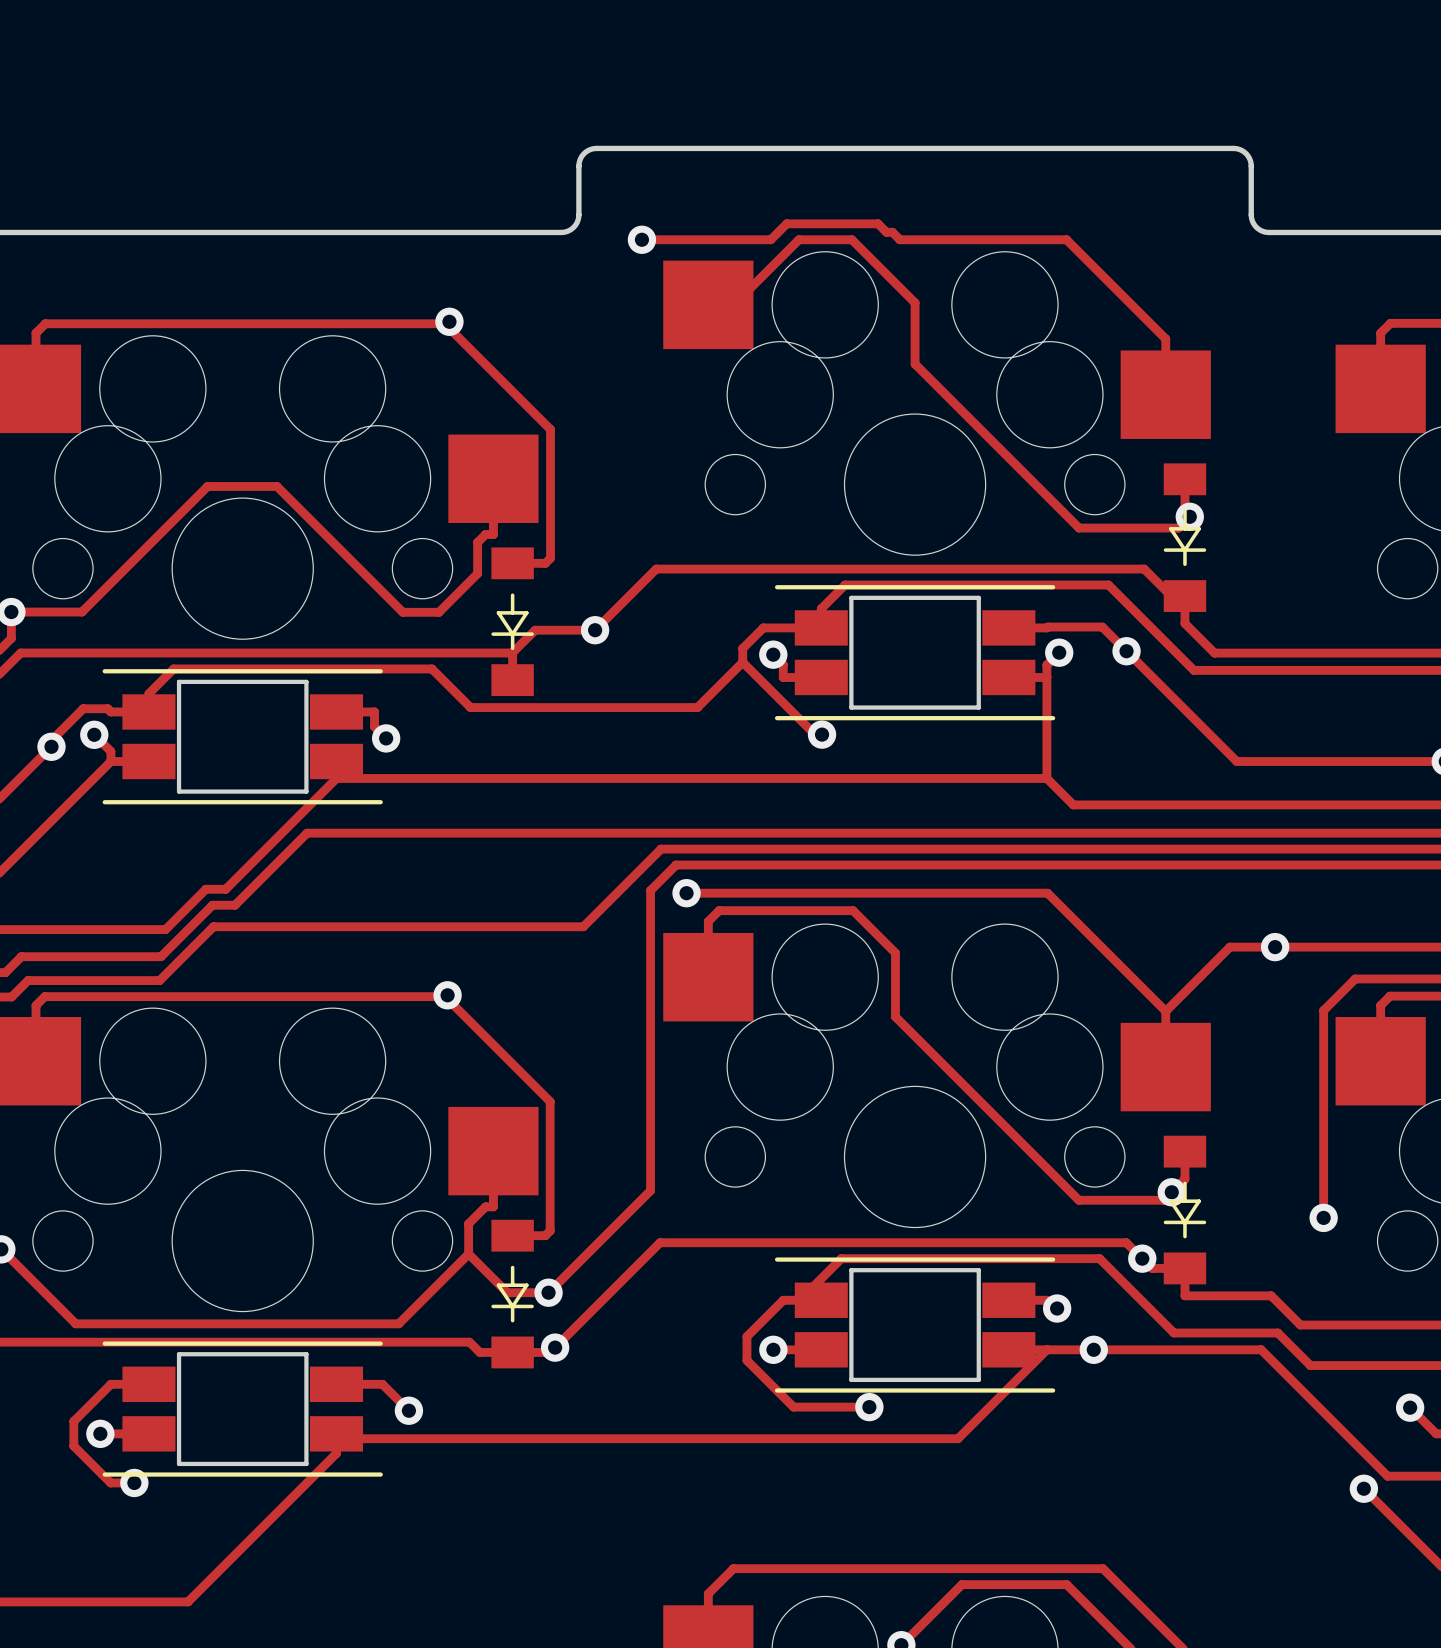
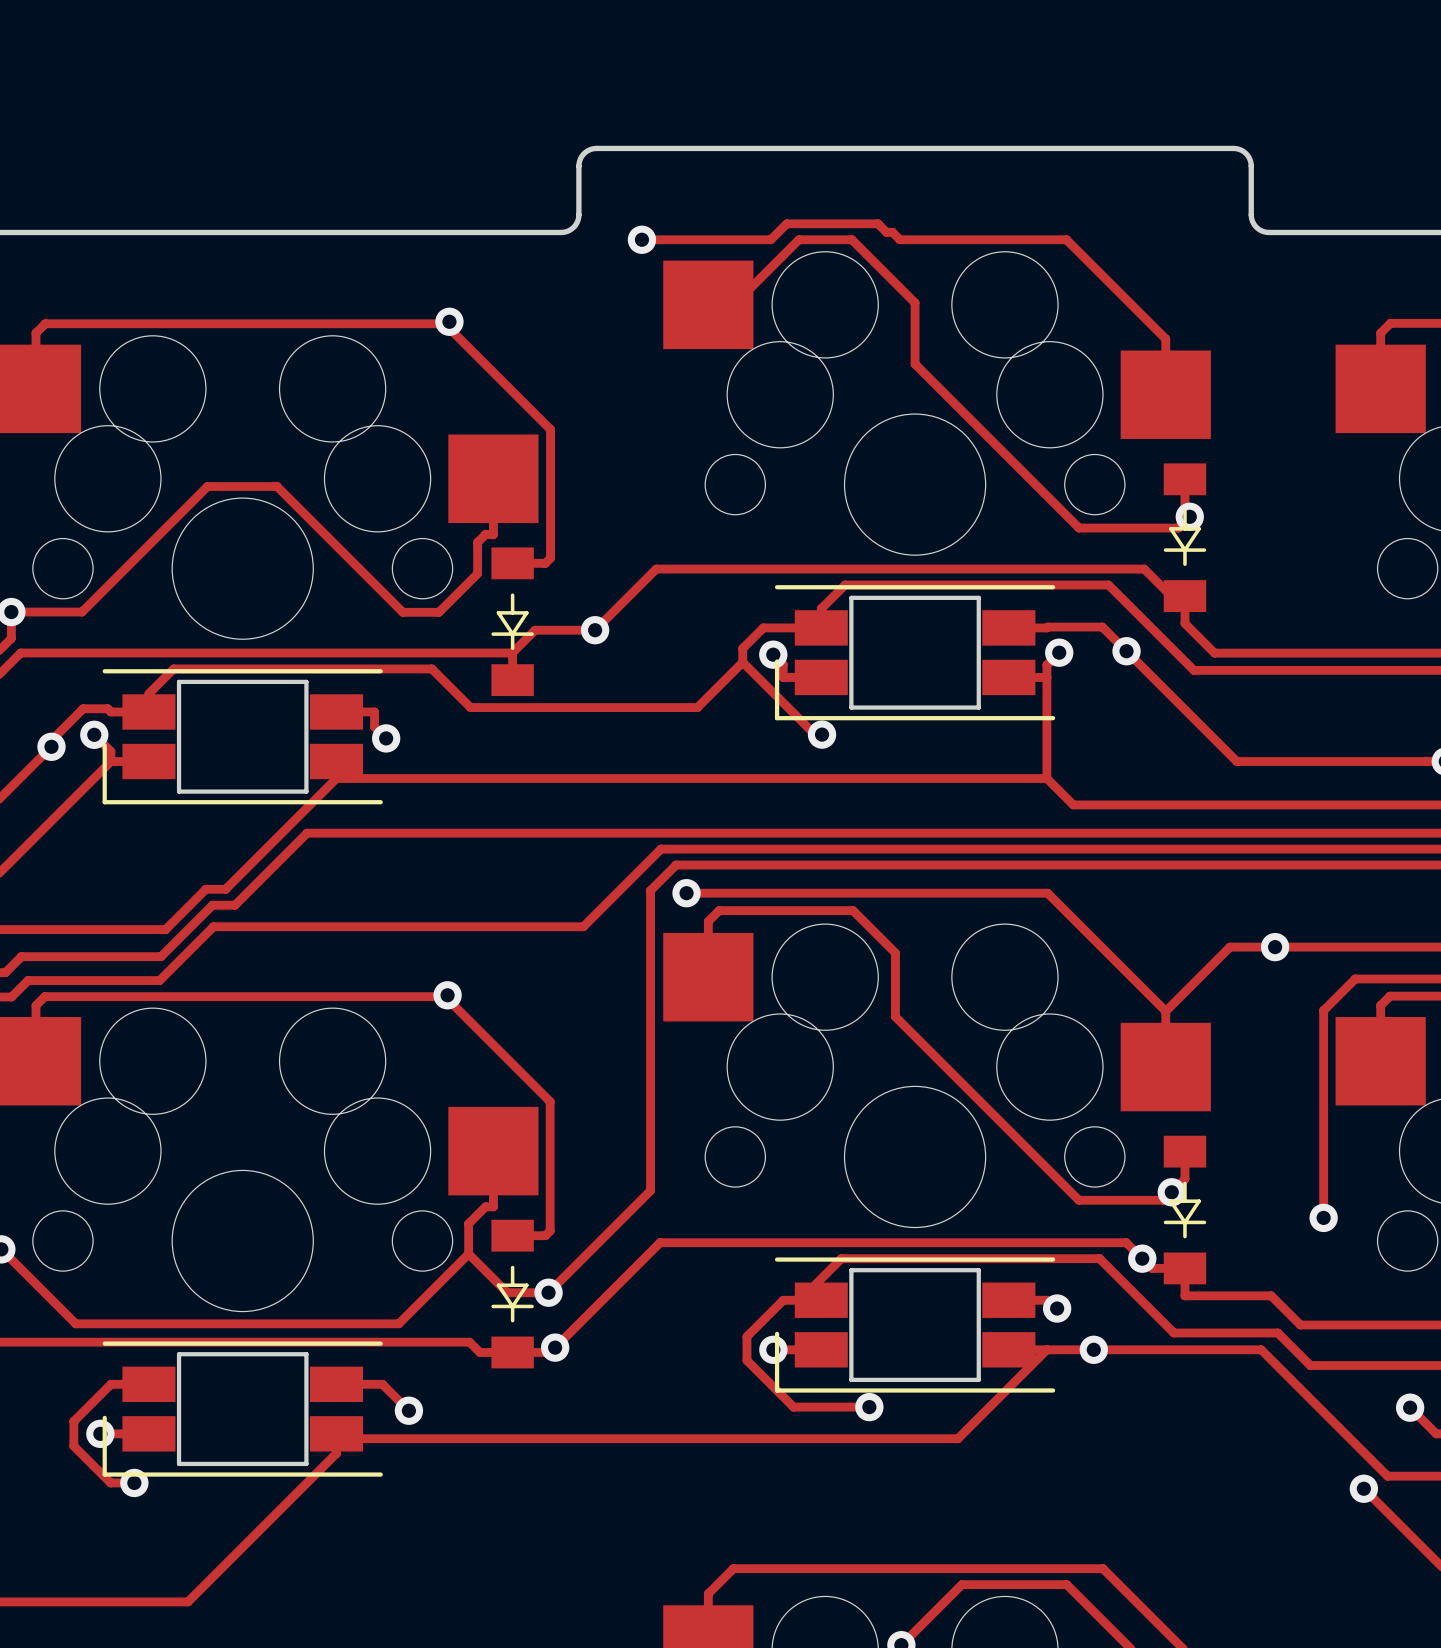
part footprint: [774, 585, 1056, 721] -> [774, 585, 1056, 721]
part footprint: [102, 669, 383, 805] -> [102, 669, 383, 805]
part footprint: [774, 1257, 1056, 1393] -> [774, 1257, 1056, 1393]
part footprint: [102, 1341, 383, 1477] -> [102, 1341, 383, 1477]

